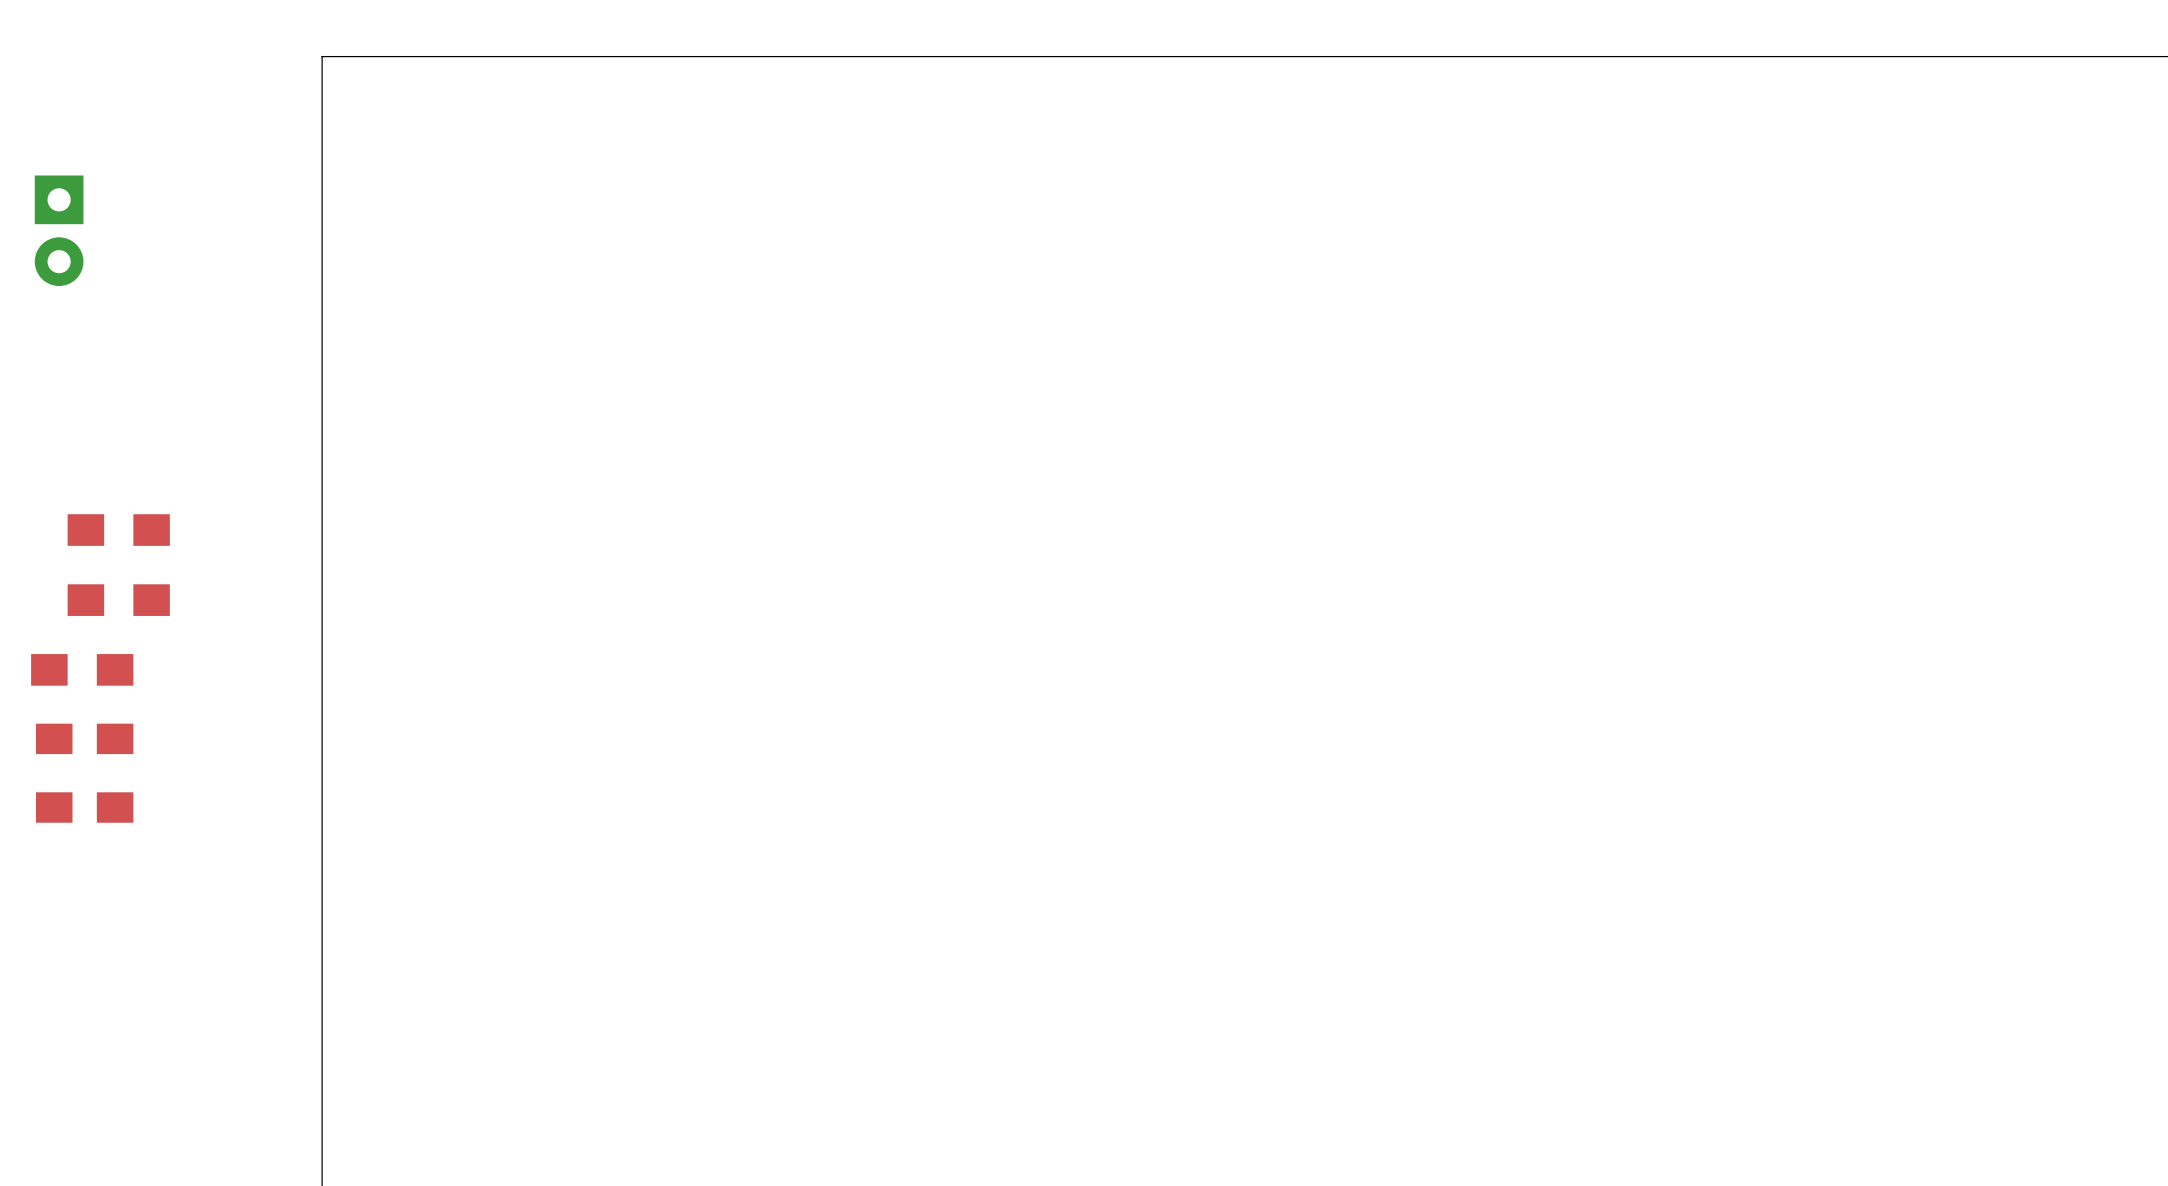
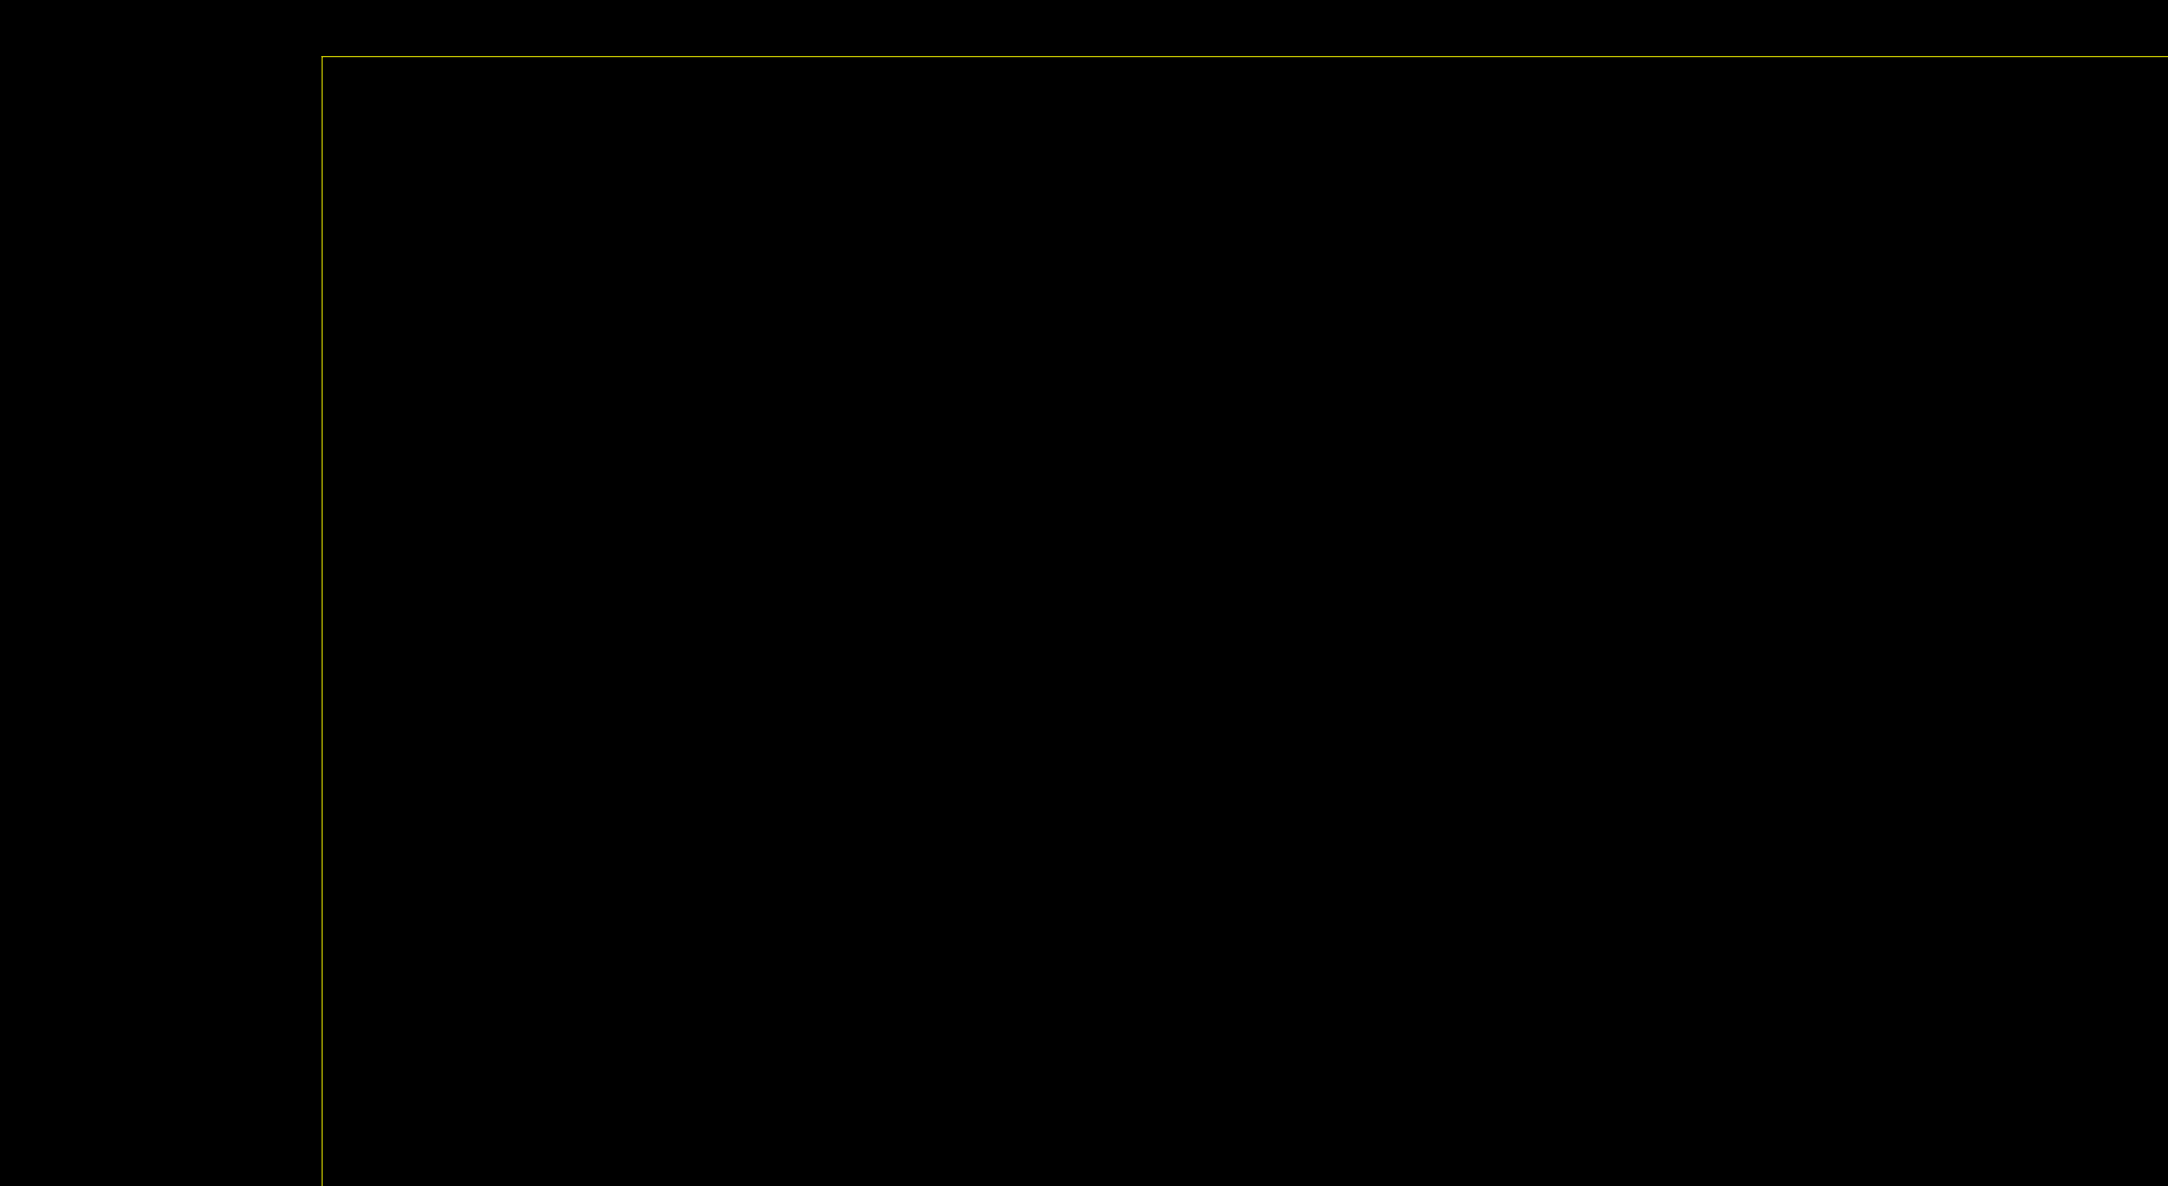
part: (59, 230) -> none
part: (118, 530) -> none
part: (118, 600) -> none
part: (82, 669) -> none
part: (84, 738) -> none
part: (84, 807) -> none

